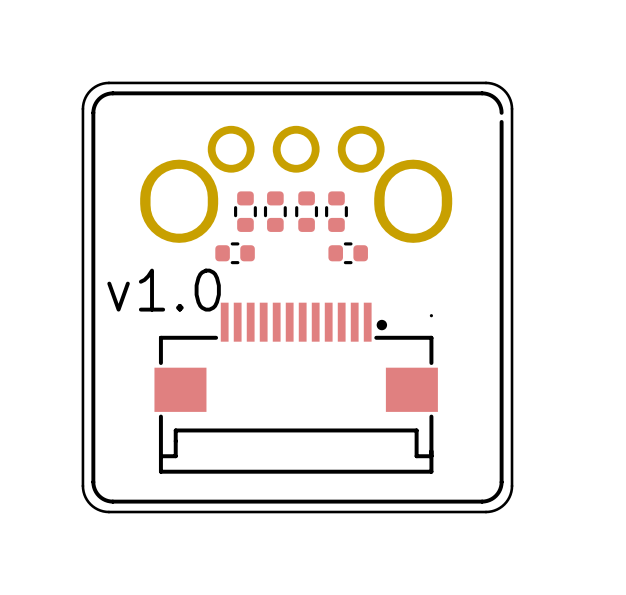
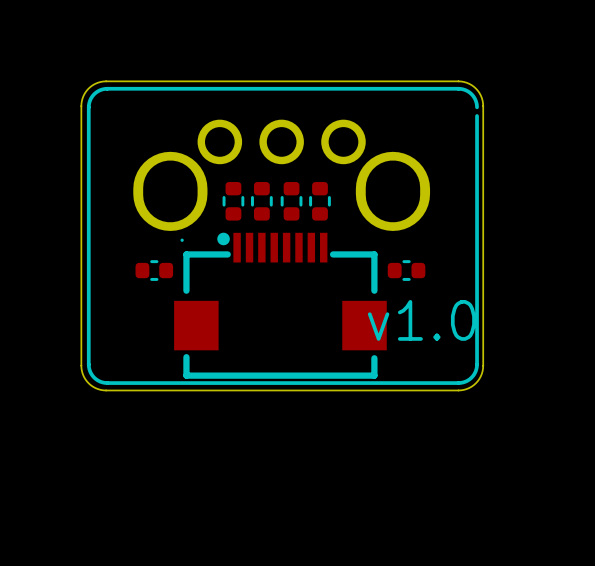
board edge: (108, 82) (486, 82) (494, 84) (504, 90) (509, 97) (512, 108) (512, 486) (510, 494) (504, 504) (494, 510) (486, 512) (108, 512) (97, 509) (90, 504) (85, 497) (82, 486) (82, 108) (85, 97) (90, 90) (97, 85) (108, 82) -> (106, 81) (95, 83) (88, 88) (83, 95) (81, 106) (81, 365) (83, 376) (90, 385) (106, 390) (458, 390) (469, 388) (477, 381) (483, 365) (483, 106) (480, 95) (473, 86) (458, 81) (106, 81)
part position: (235, 253) -> (154, 270)
part position: (348, 253) -> (406, 270)
text position: v1.0 (164, 290) -> v1.0 (421, 320)
part: none -> (280, 305)
line: (93, 383) (93, 484) (99, 495) (112, 501) (487, 500) (495, 495) (501, 484) (501, 383) -> (88, 364) (94, 377) (107, 383) (458, 383) (471, 377) (477, 364)
part: (296, 388) -> none

